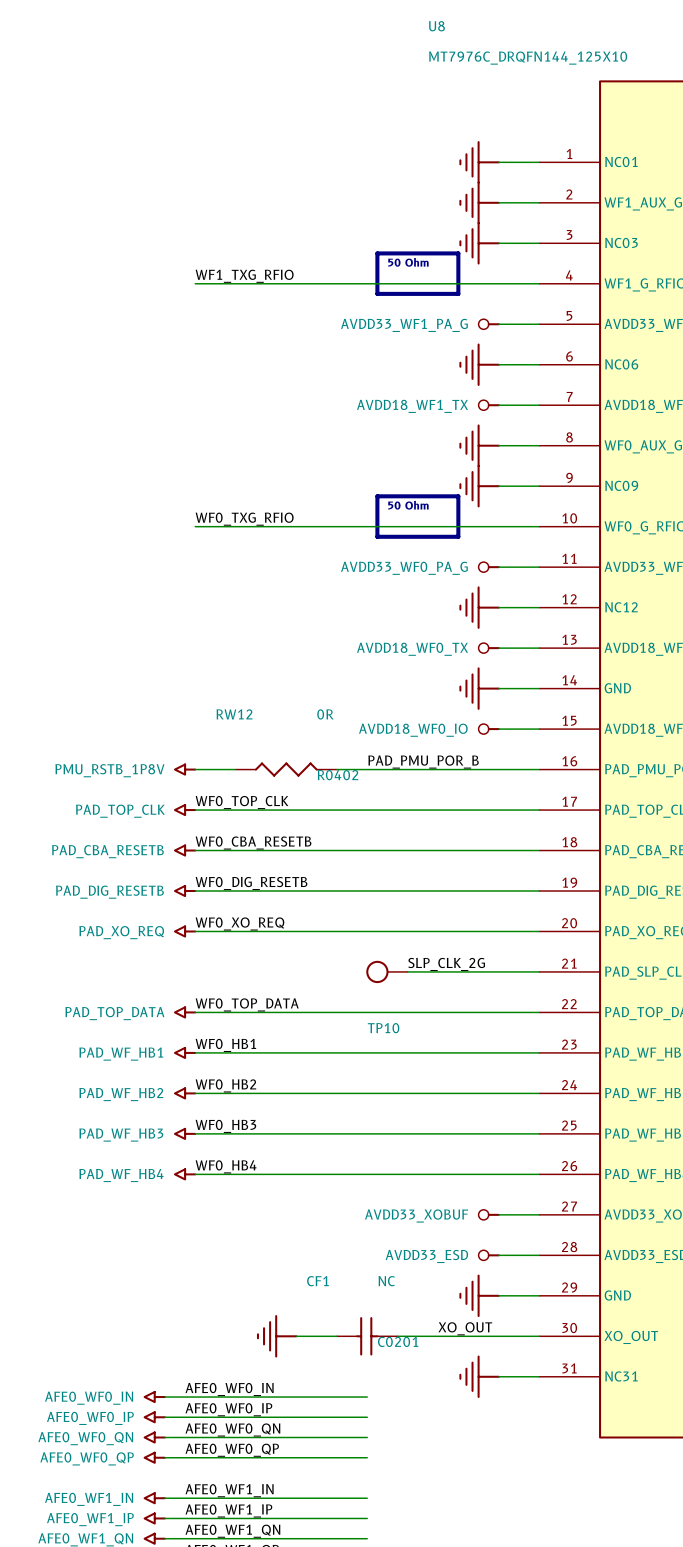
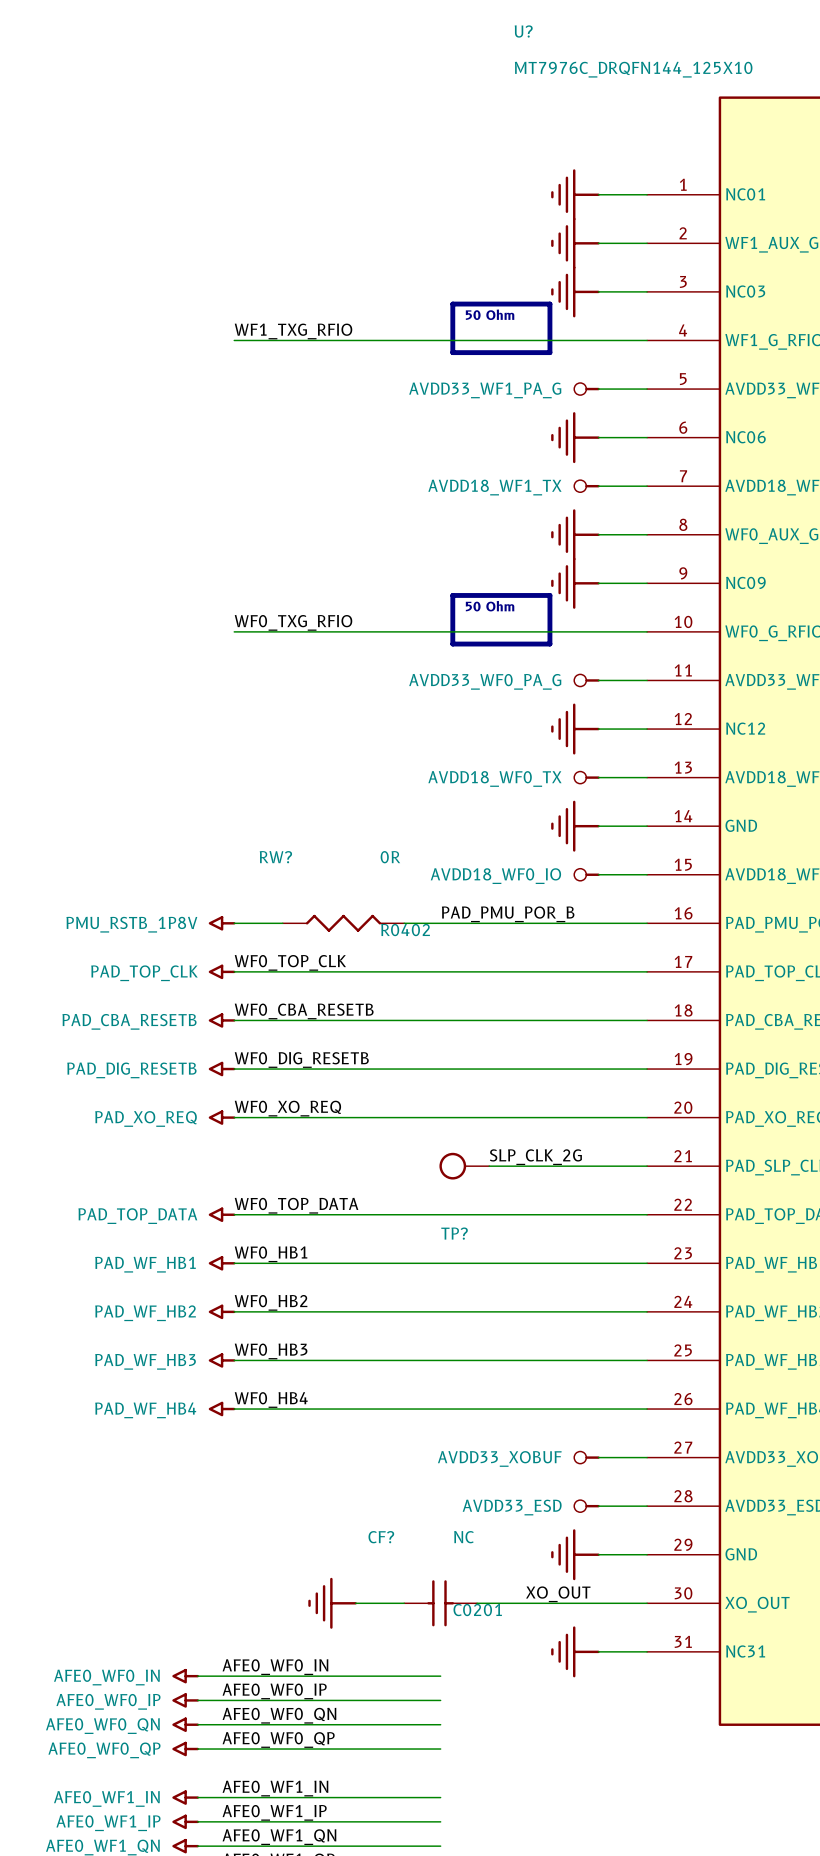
U8 name: U8 (436, 26) -> U? (523, 31)
RW12 name: RW12 (234, 714) -> RW? (275, 857)
TP10 name: TP10 (383, 1028) -> TP? (454, 1233)
CF1 name: CF1 (317, 1281) -> CF? (381, 1537)

